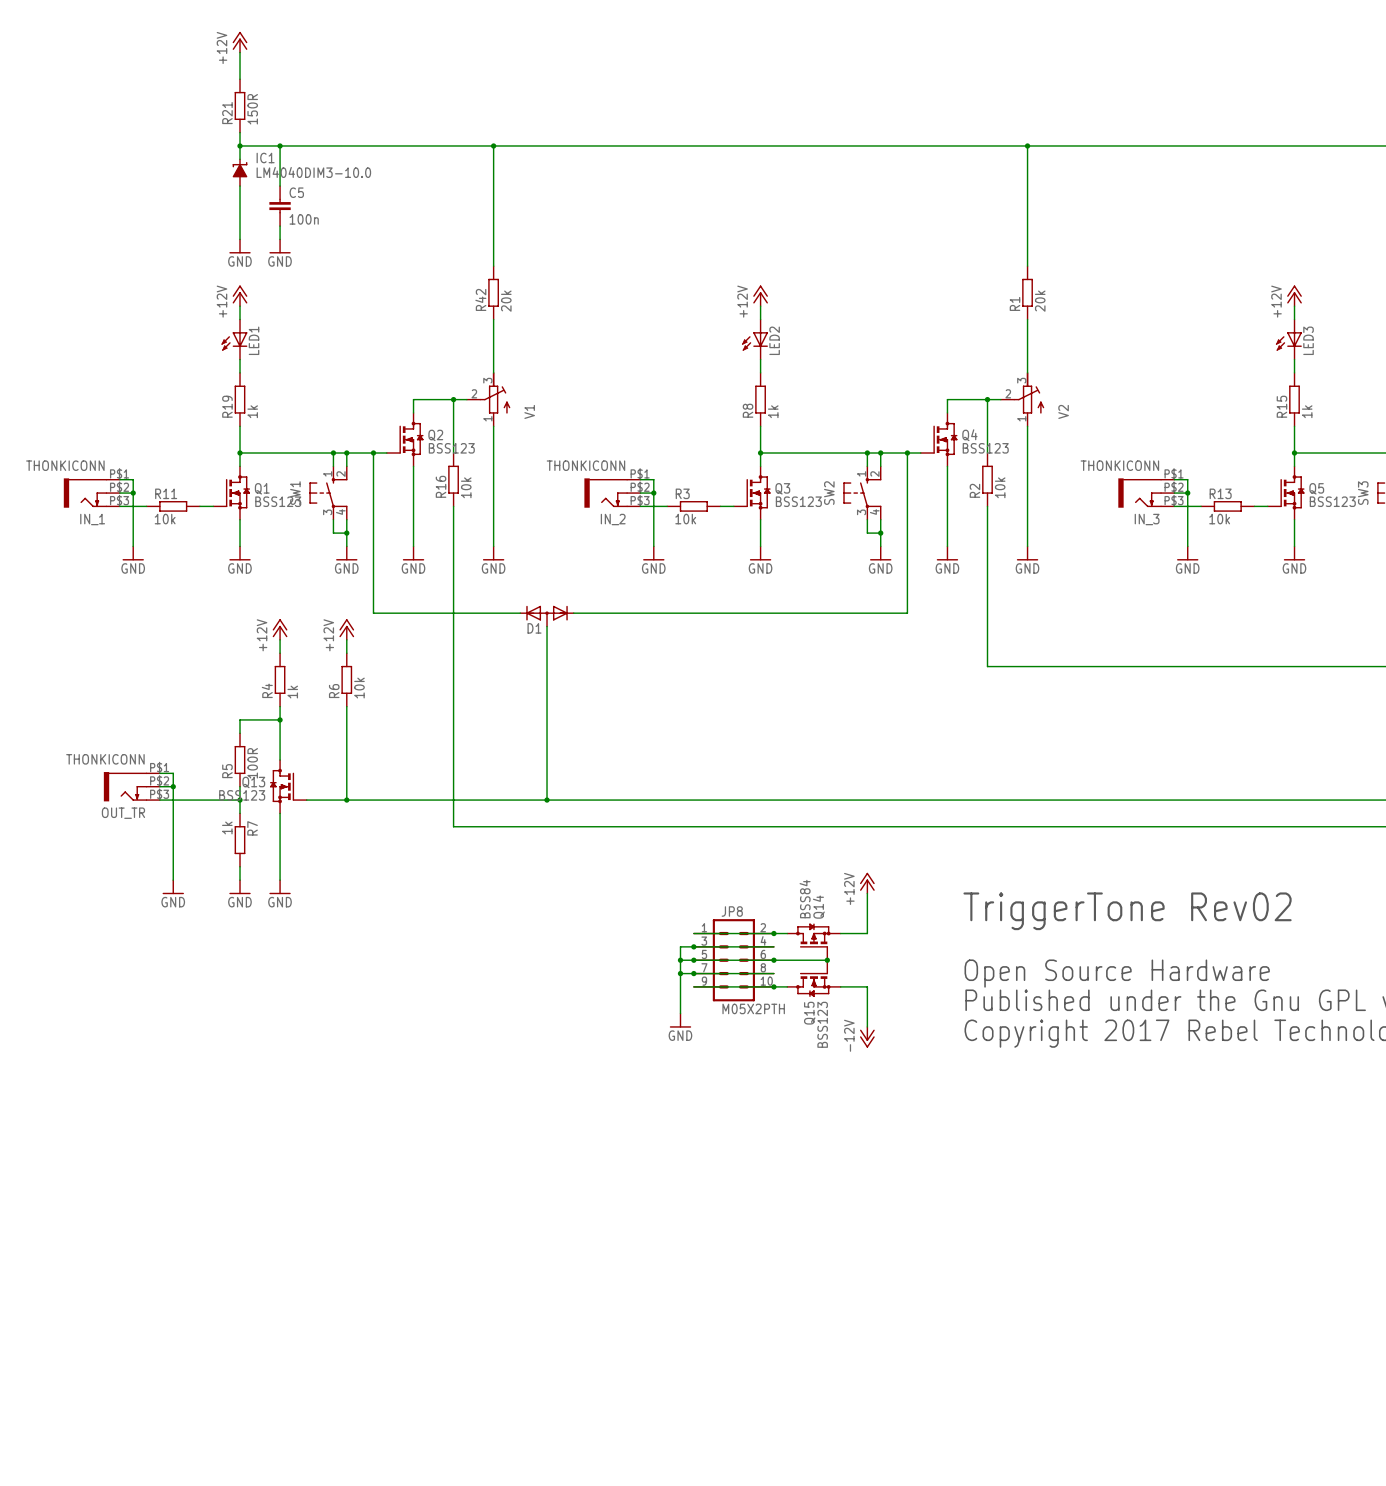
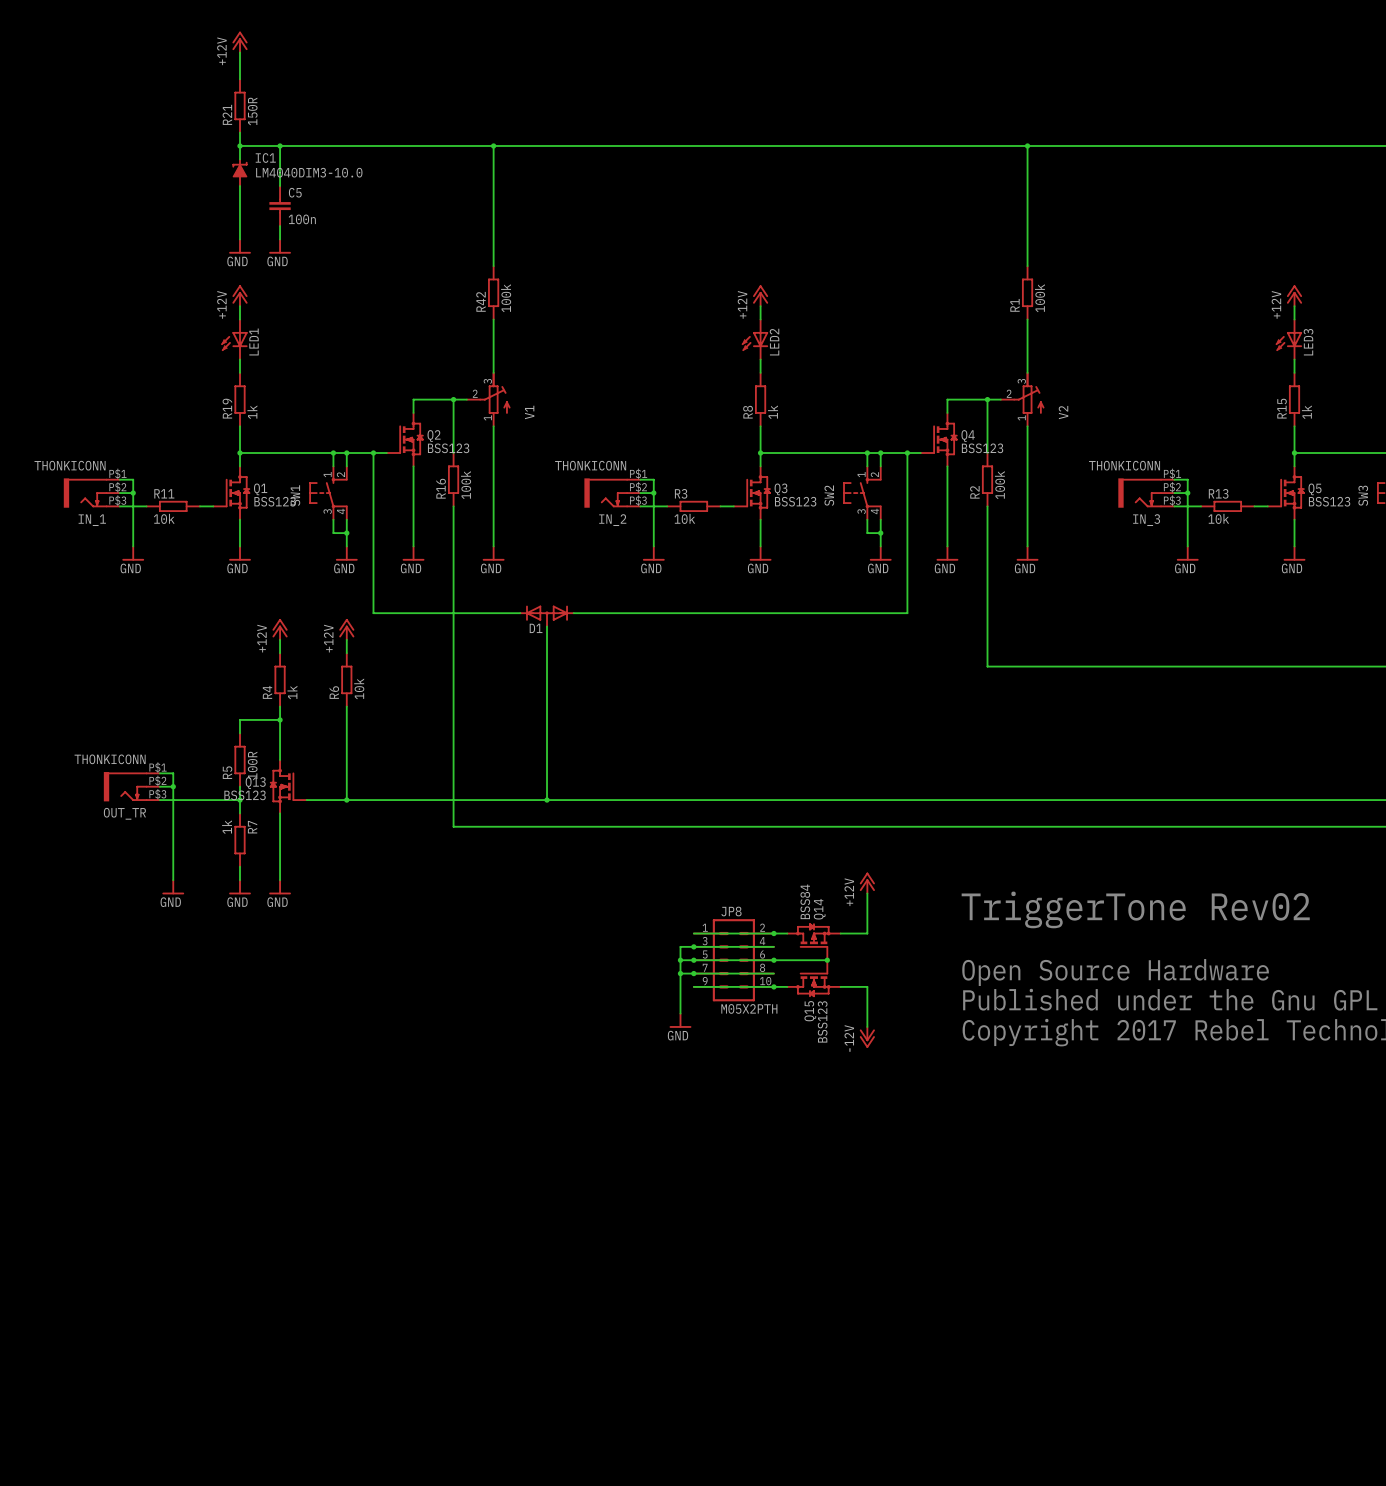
R42 value: 20k (506, 301) -> 100k (506, 298)
R1 value: 20k (1040, 301) -> 100k (1040, 298)
R16 value: 10k (466, 487) -> 100k (466, 485)
R2 value: 10k (1000, 487) -> 100k (999, 485)

